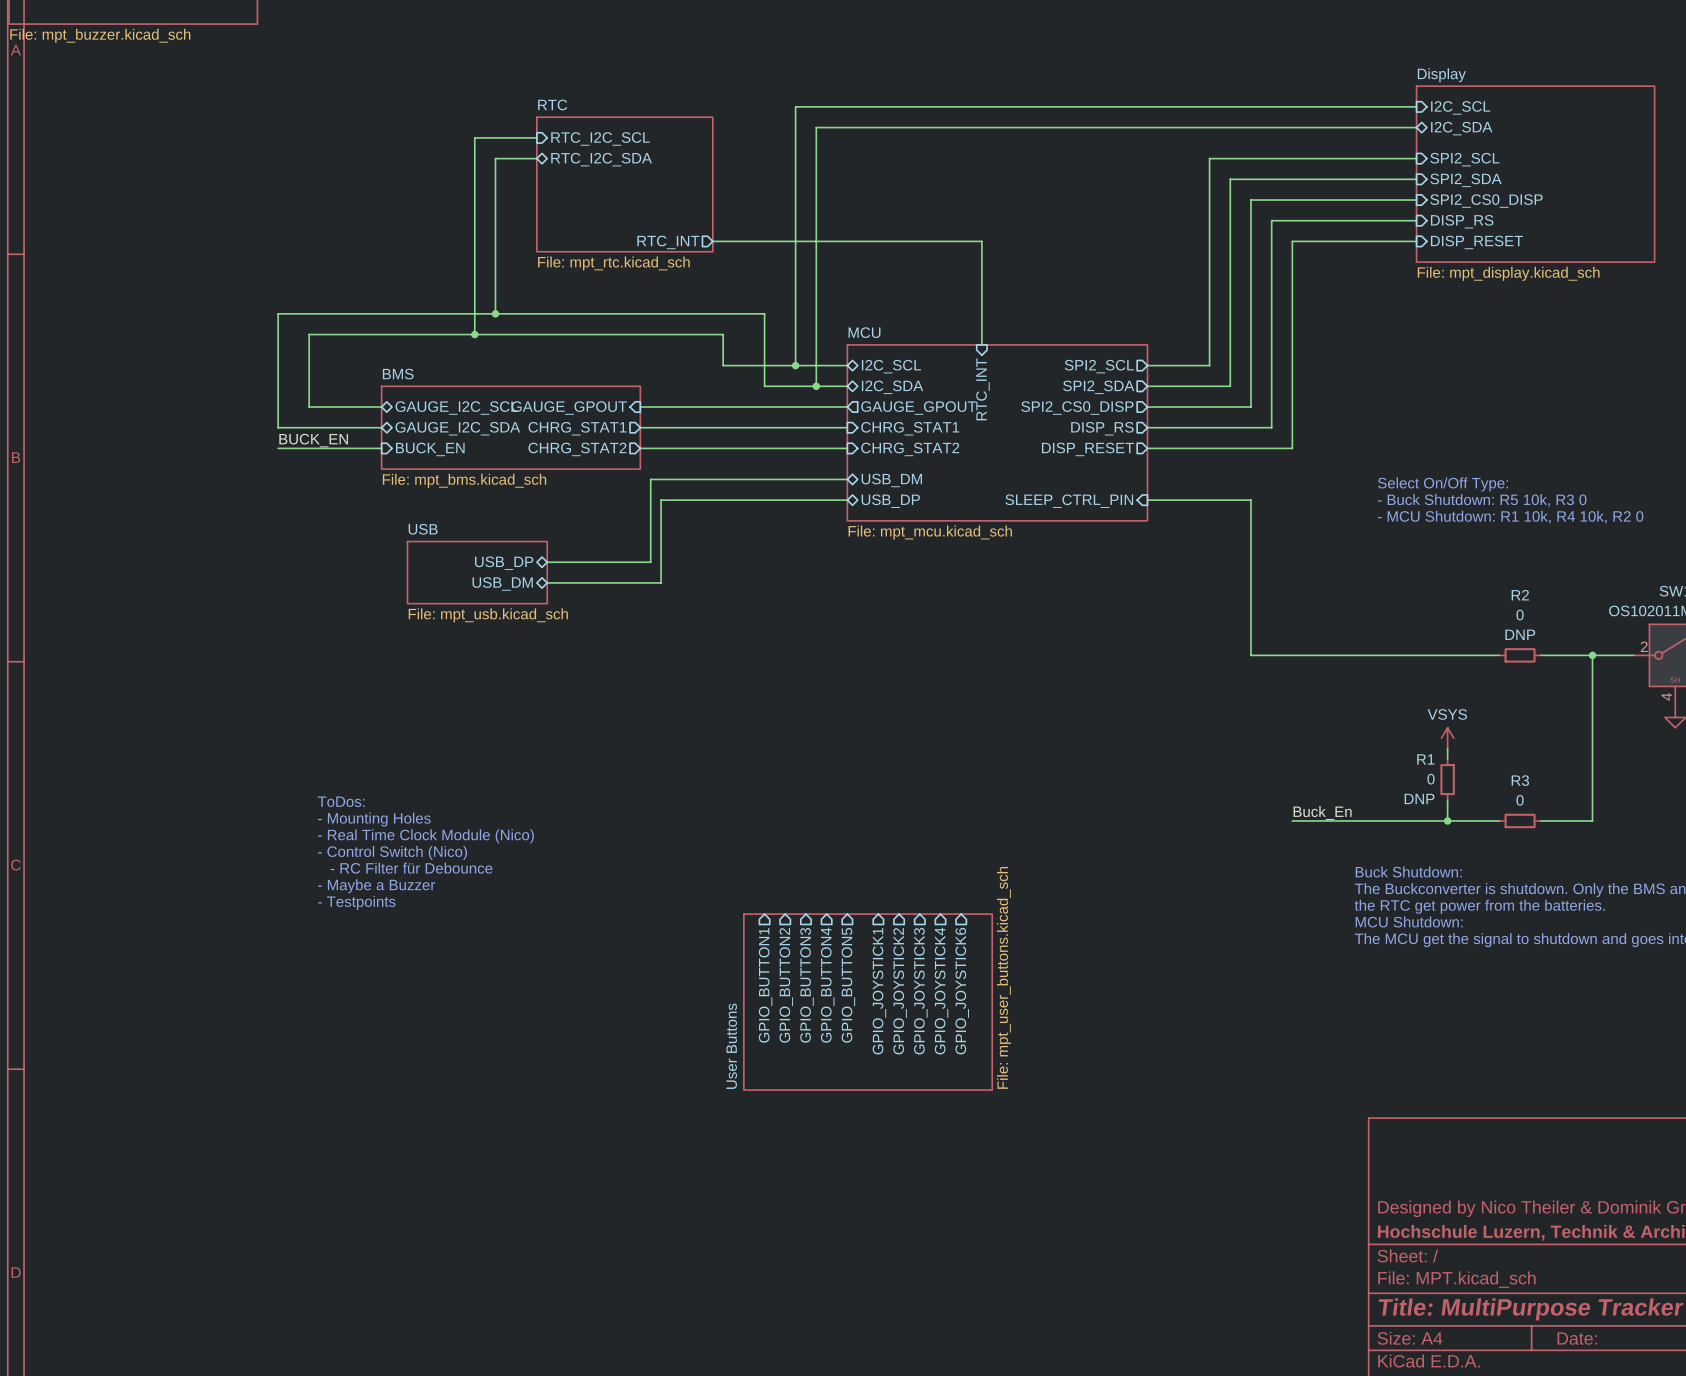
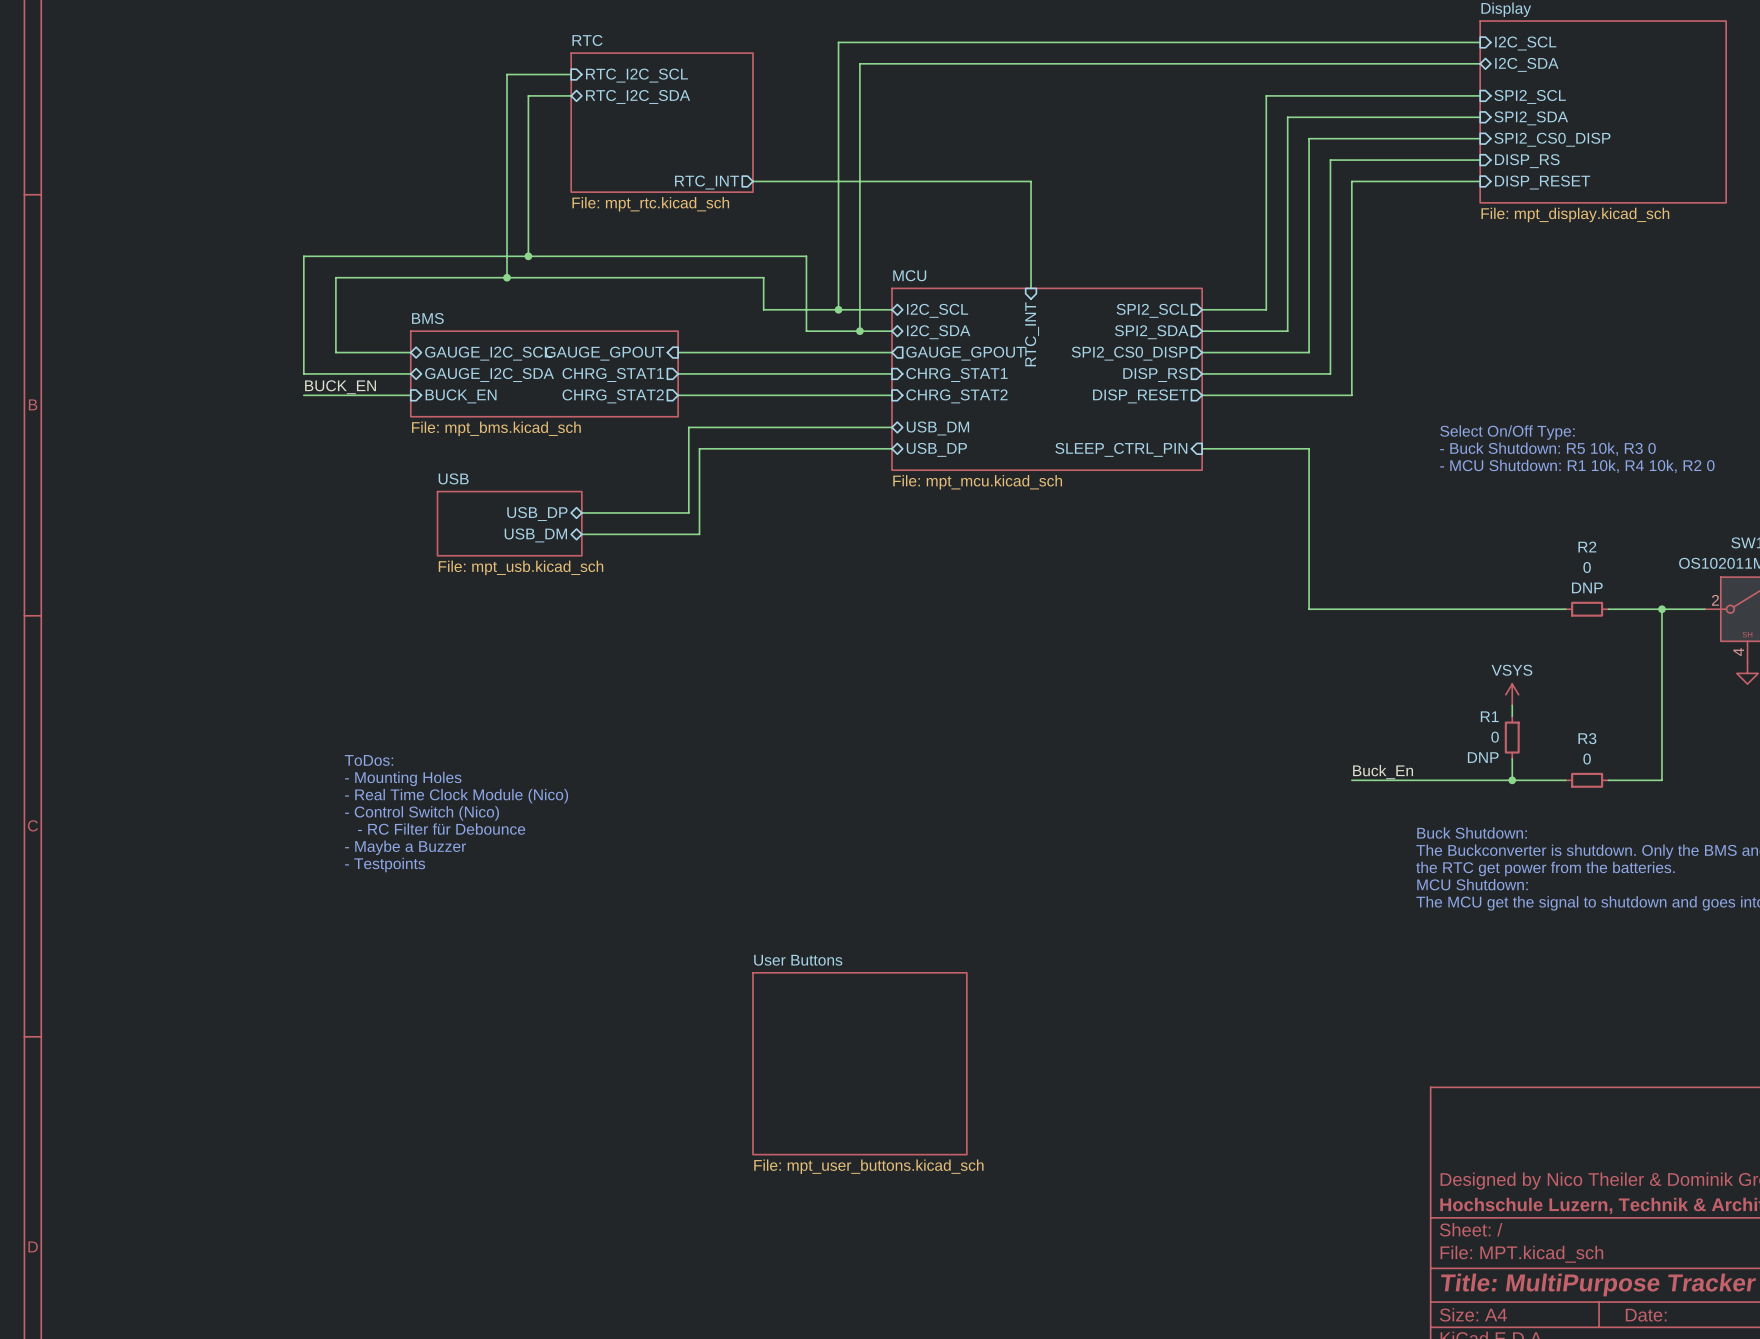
sheet pin: GPIO_BUTTON1 (765, 985) -> none
sheet pin: GPIO_BUTTON2 (786, 985) -> none
sheet pin: GPIO_BUTTON3 (806, 985) -> none
sheet pin: GPIO_BUTTON4 (827, 985) -> none
sheet pin: GPIO_BUTTON5 (848, 985) -> none
sheet pin: GPIO_JOYSTICK1 (879, 991) -> none
sheet pin: GPIO_JOYSTICK2 (900, 991) -> none
sheet pin: GPIO_JOYSTICK3 (920, 991) -> none
sheet pin: GPIO_JOYSTICK4 (941, 991) -> none
sheet pin: GPIO_JOYSTICK6 (962, 991) -> none
sheet User Buttons: File: mpt_user_buttons.kicad_sch (868, 1002) -> none
sheet User Buttons: none -> File: mpt_user_buttons.kicad_sch (859, 1063)

